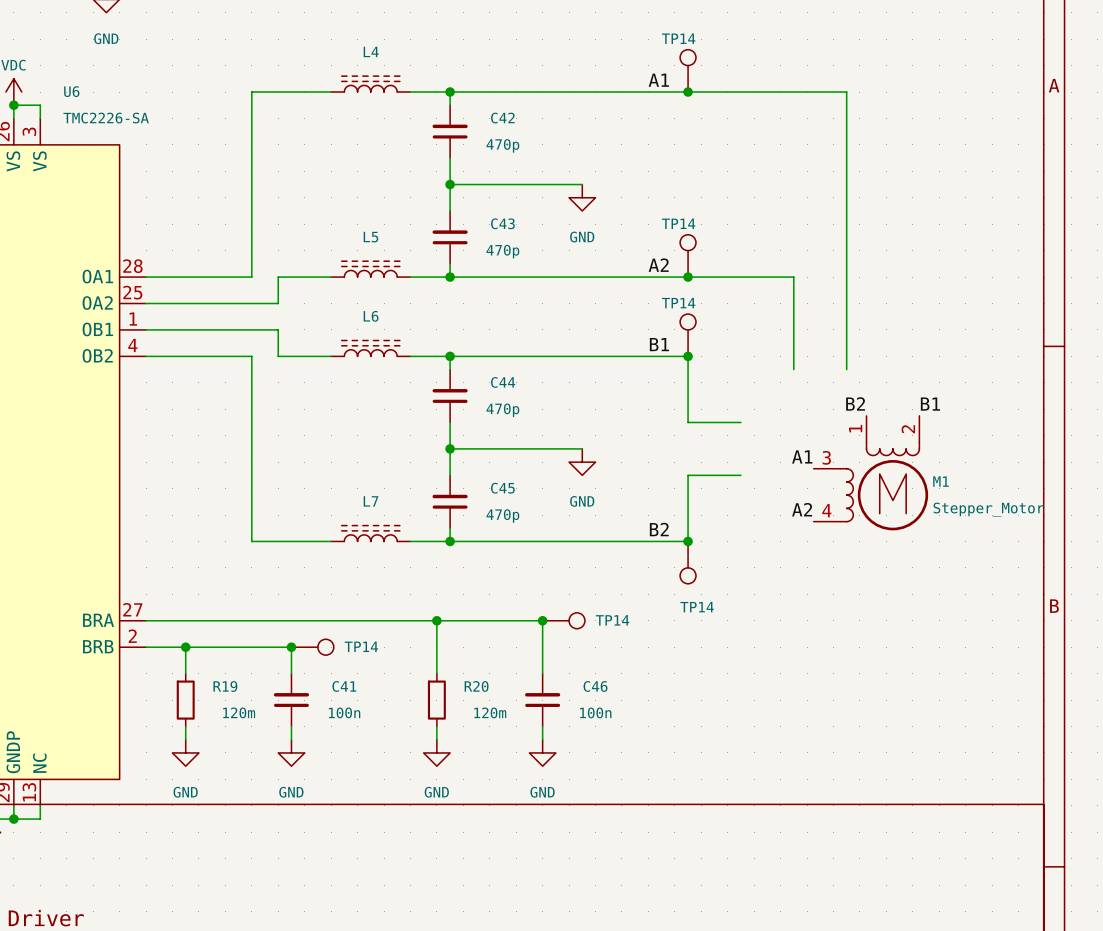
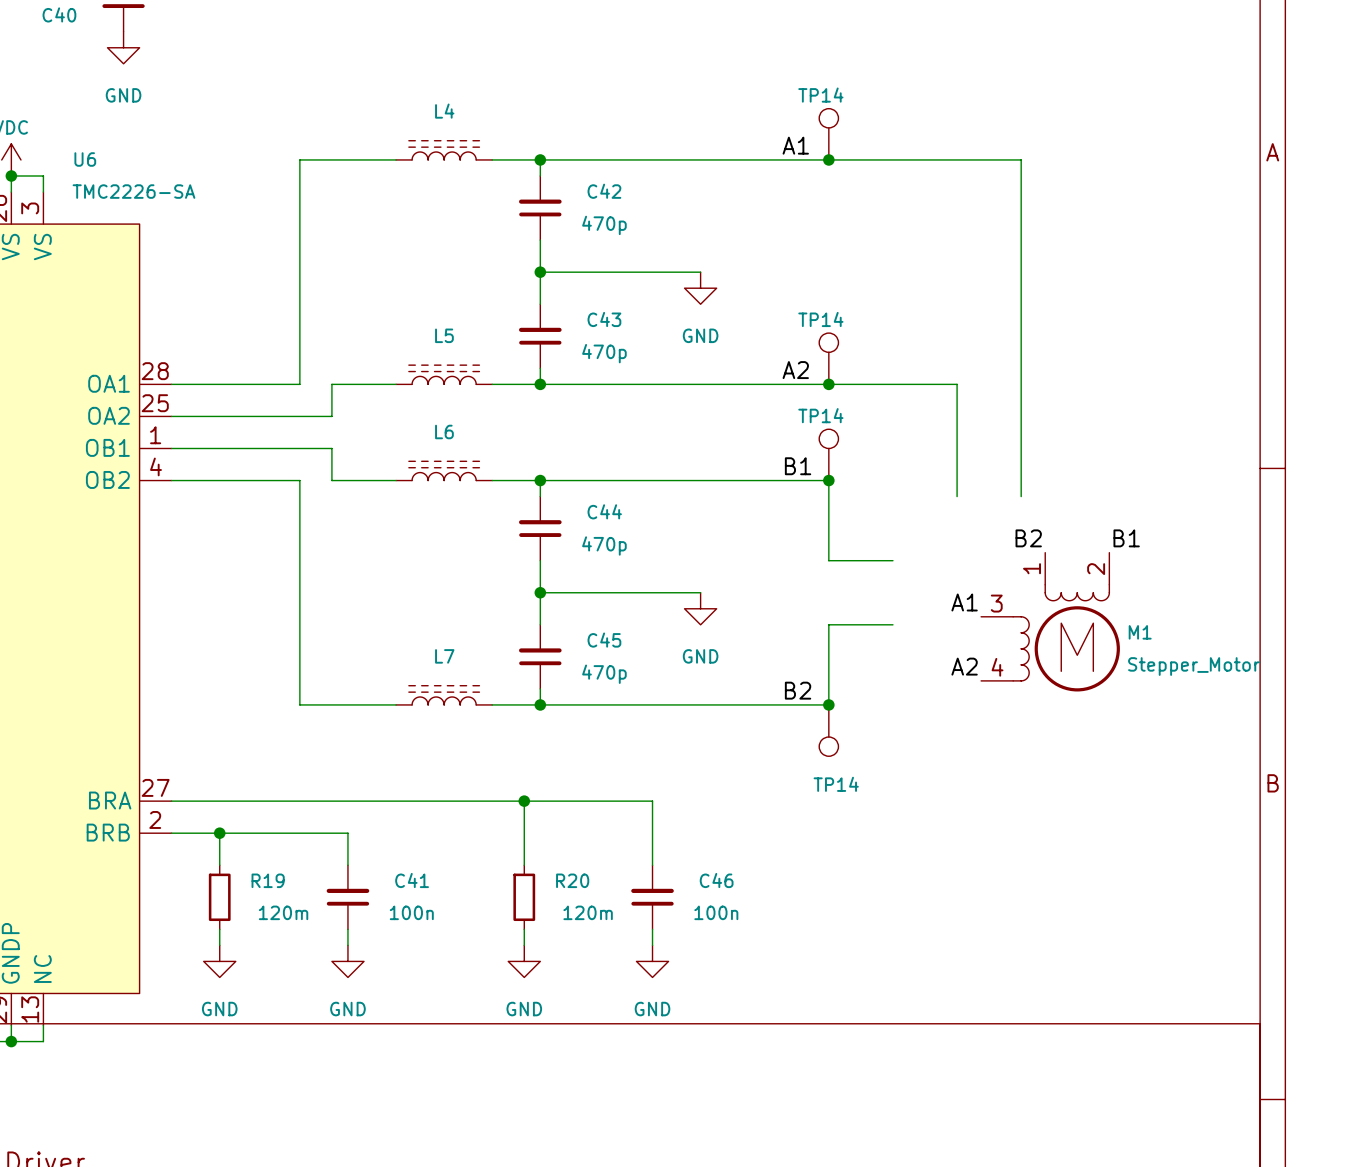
junction: (542, 620) -> none
TP14: (563, 620) -> none
junction: (291, 647) -> none
TP14: (312, 647) -> none

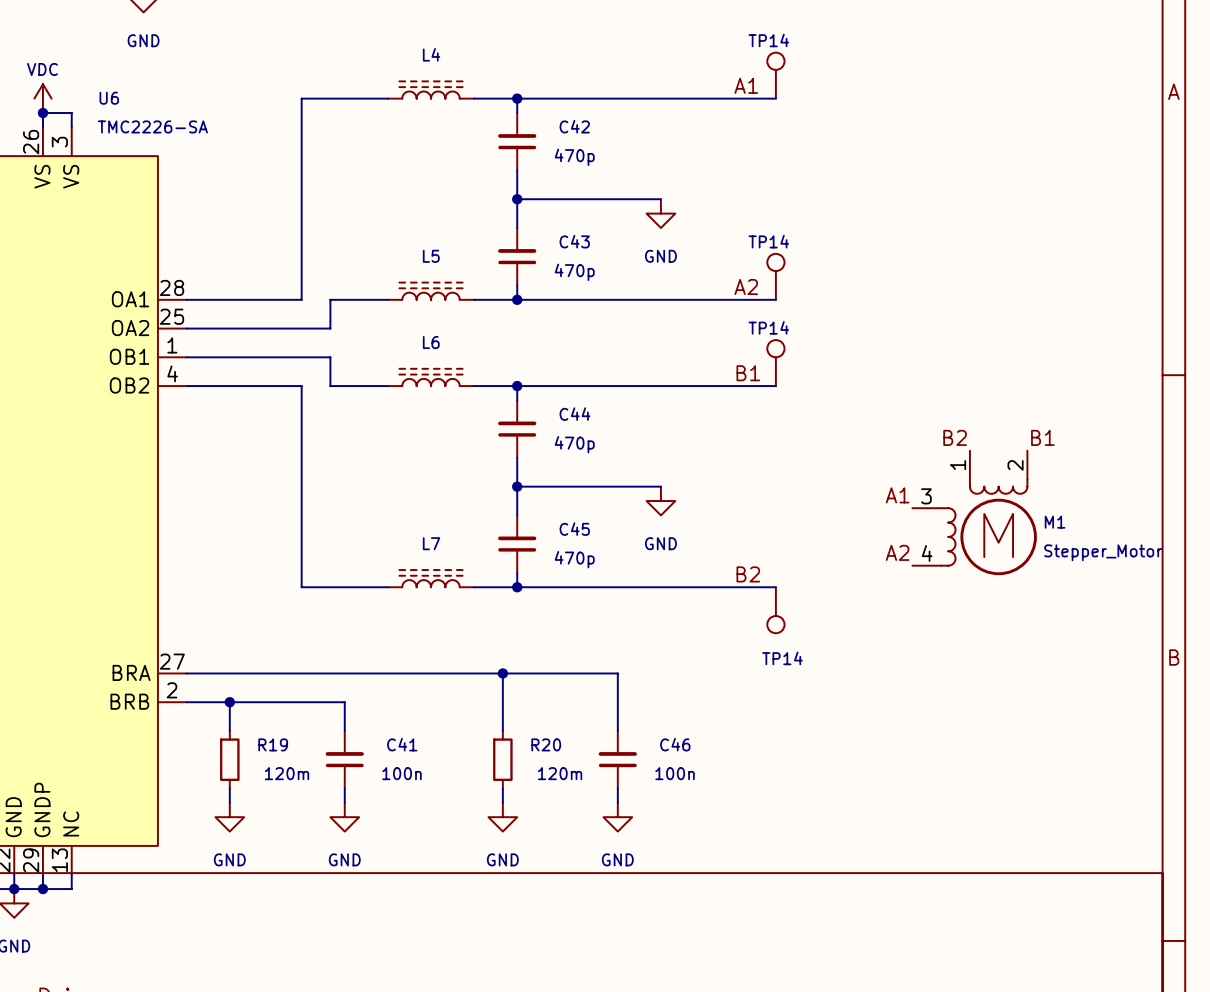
wire: (828, 159) (1021, 159) (1021, 496) -> none
junction: (828, 159) -> none
wire: (828, 384) (957, 384) (957, 496) -> none
junction: (828, 384) -> none
wire: (828, 480) (828, 560) (892, 560) -> none
junction: (828, 480) -> none
wire: (892, 624) (828, 624) (828, 704) -> none
junction: (828, 704) -> none

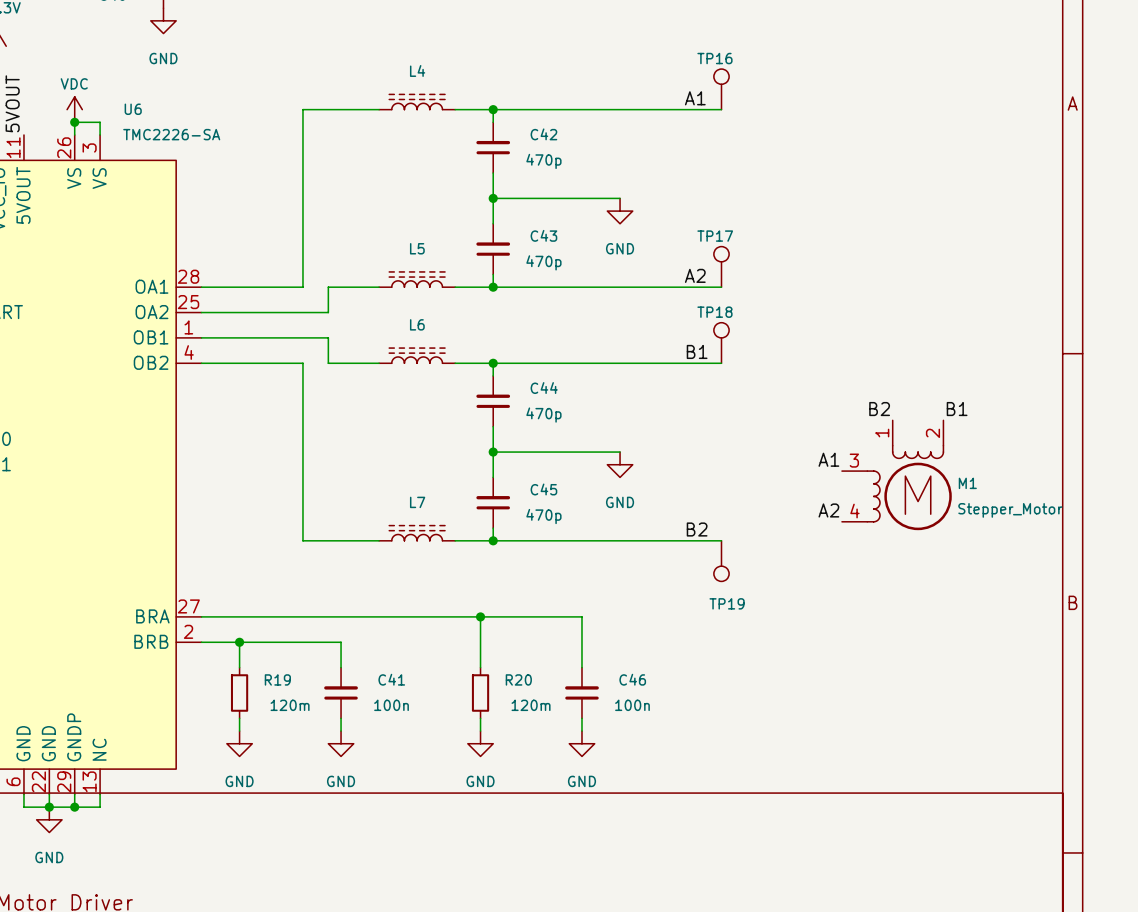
TP14 name: TP14 (768, 40) -> TP16 (714, 58)
TP14 name: TP14 (768, 241) -> TP17 (715, 236)
TP14 name: TP14 (768, 327) -> TP18 (714, 312)
TP14 name: TP14 (782, 658) -> TP19 (727, 603)

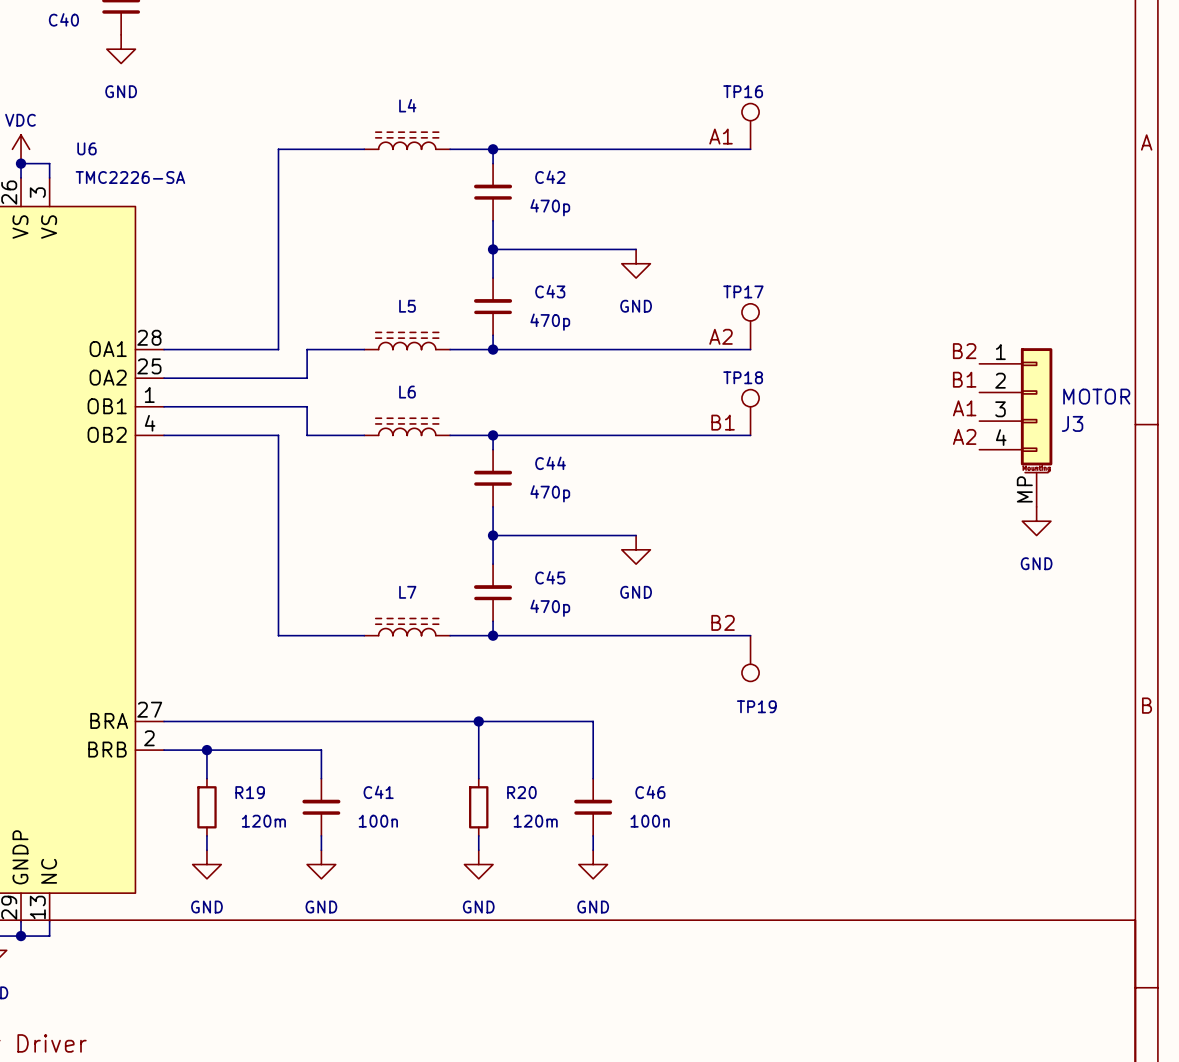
J3: none -> MOTOR (1015, 427)
label position: B2 (879, 409) -> B2 (964, 351)
label position: B1 (957, 409) -> B1 (964, 379)
power symbol: none -> GND (1036, 521)
label position: A1 (828, 459) -> A1 (964, 408)
M1: Stepper_Motor (896, 475) -> none
label position: A2 (828, 510) -> A2 (964, 436)

